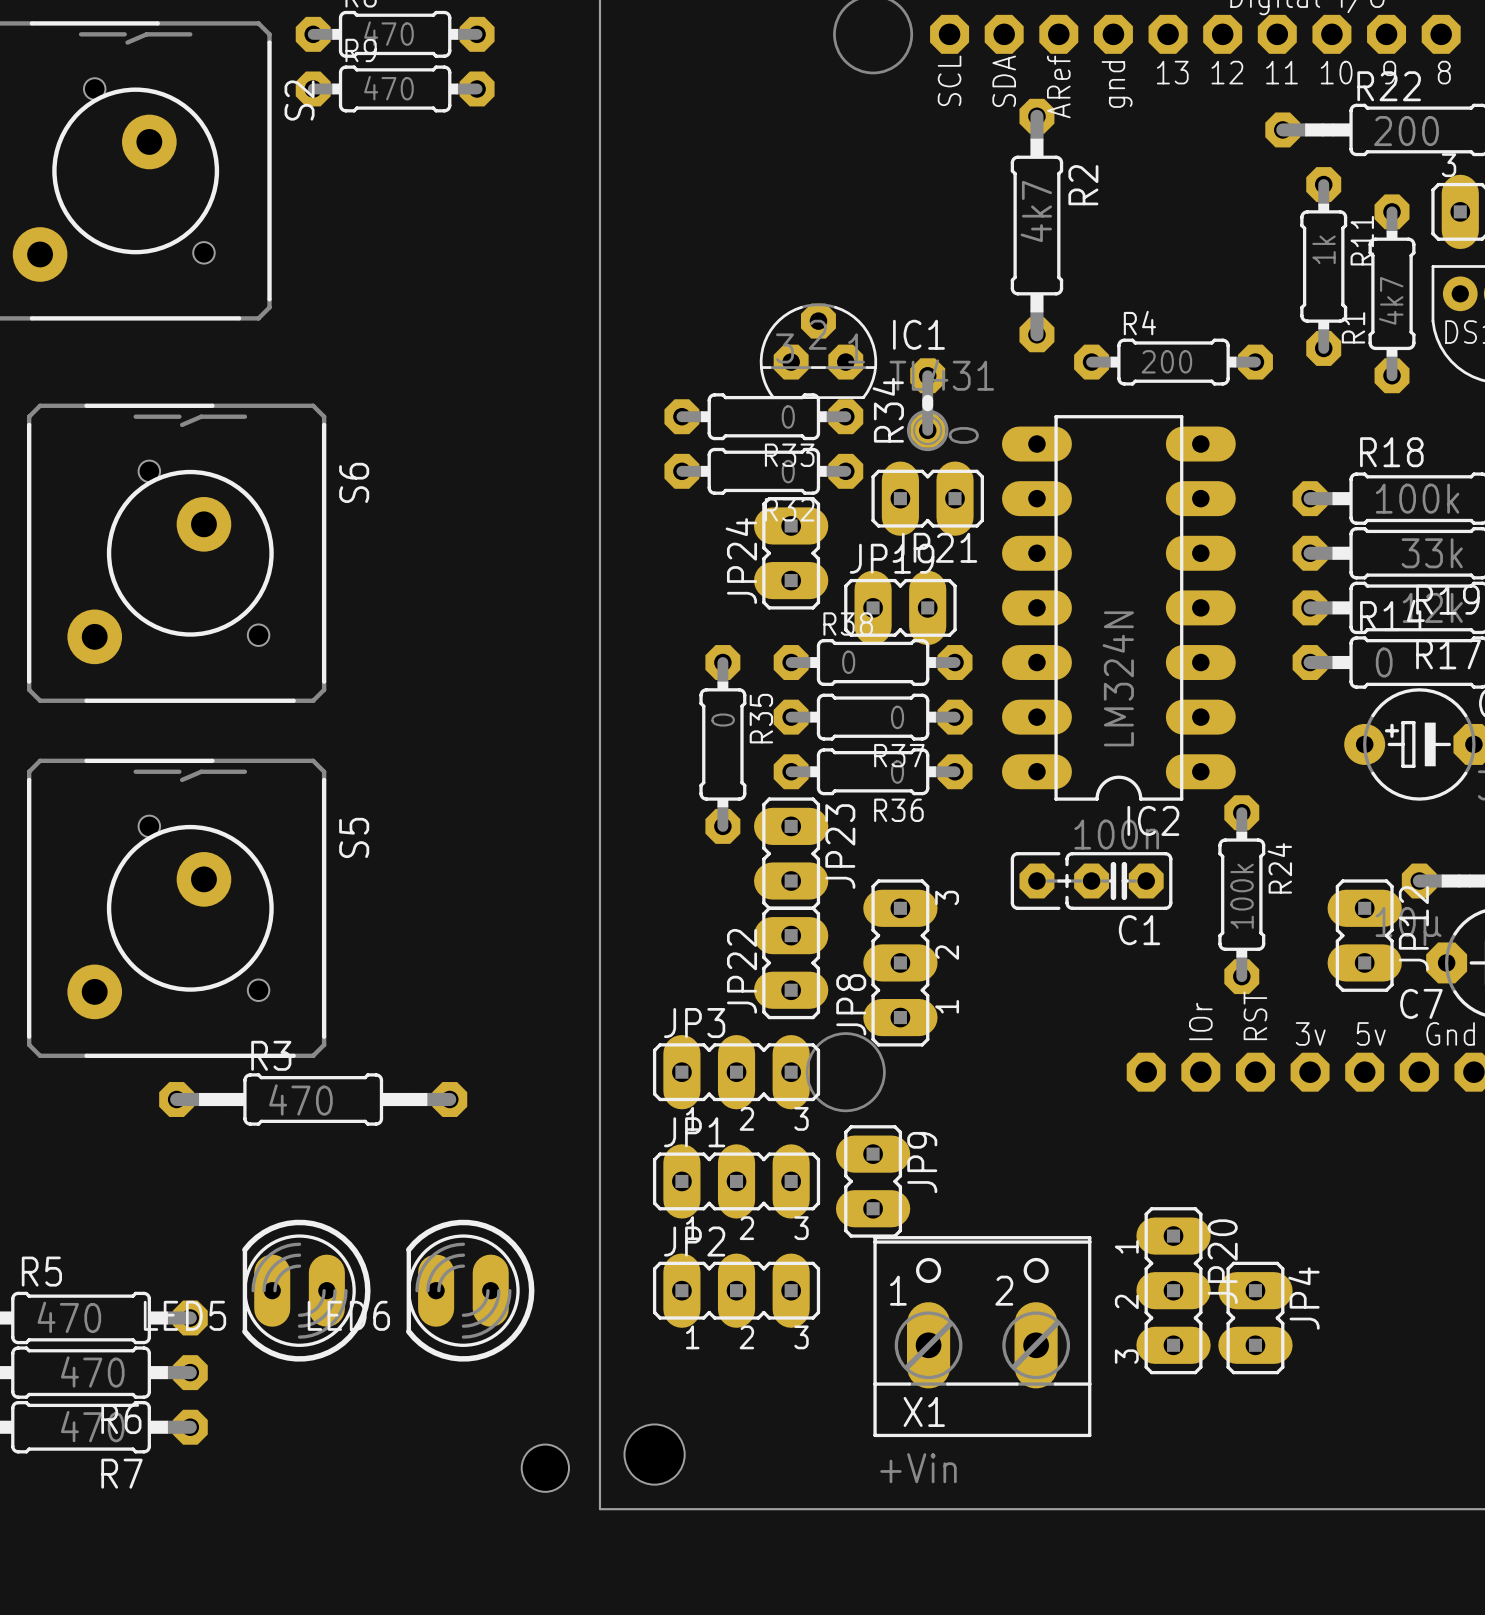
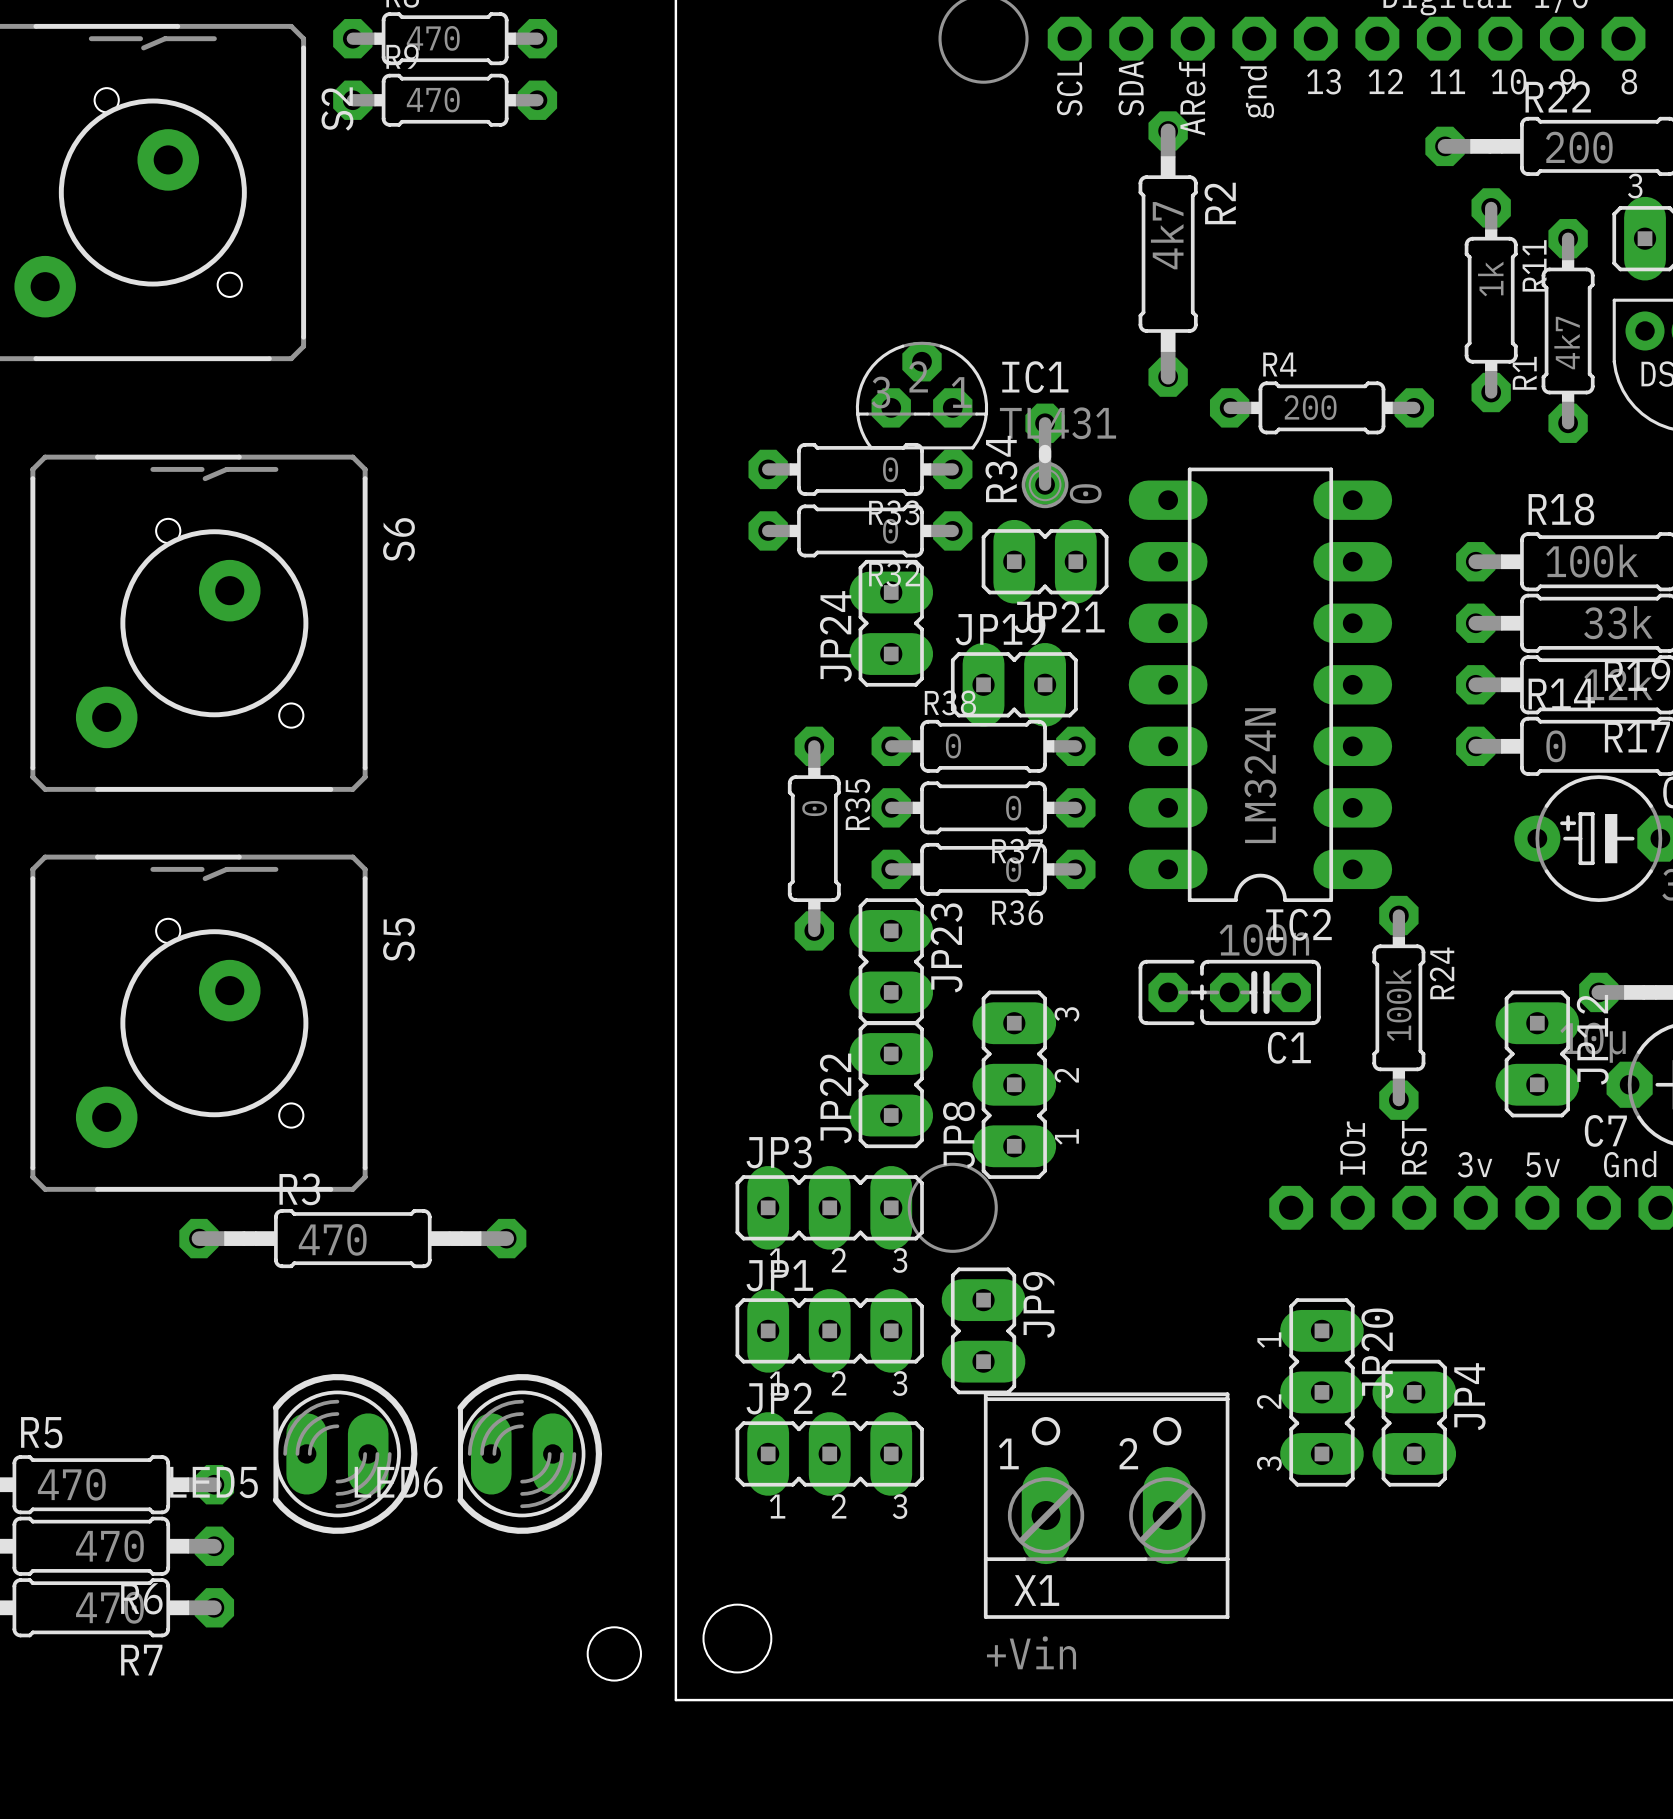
JP20 position: (1173, 1290) -> (1321, 1392)
JP4 position: (1255, 1317) -> (1414, 1423)

